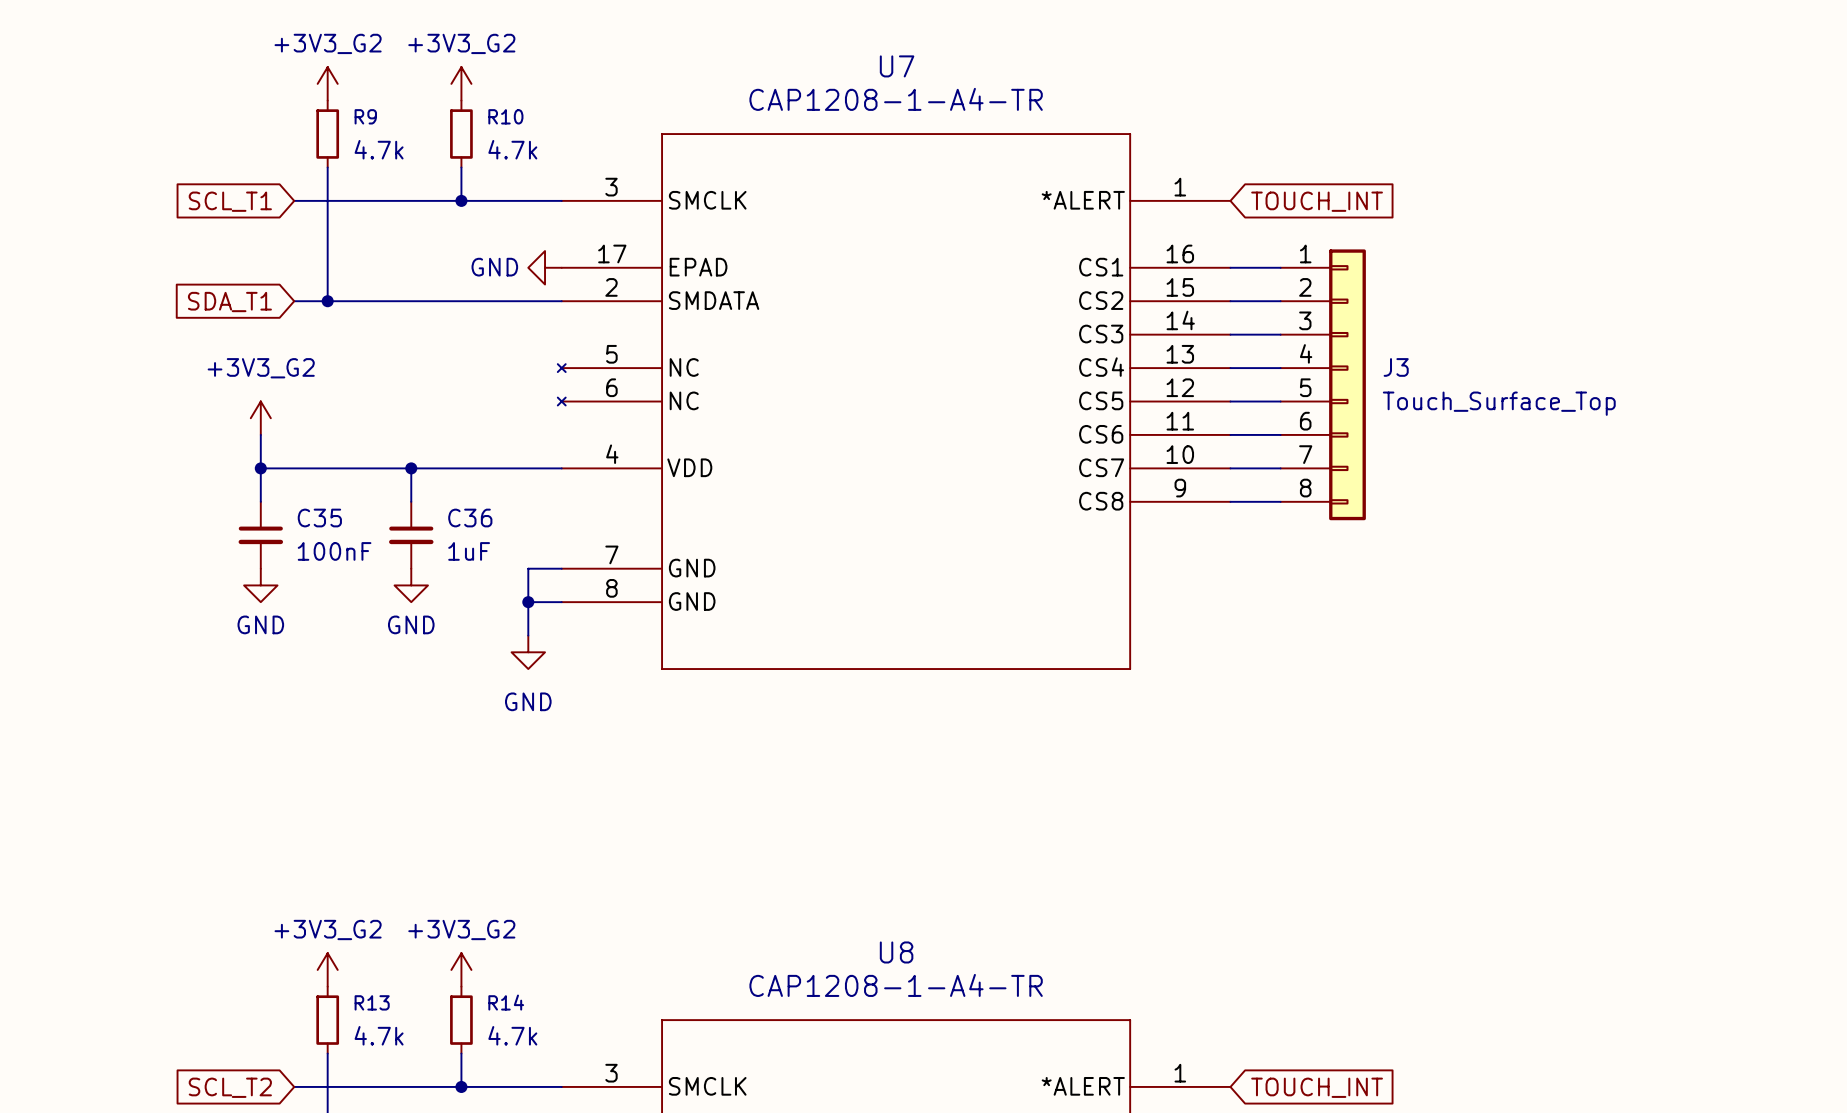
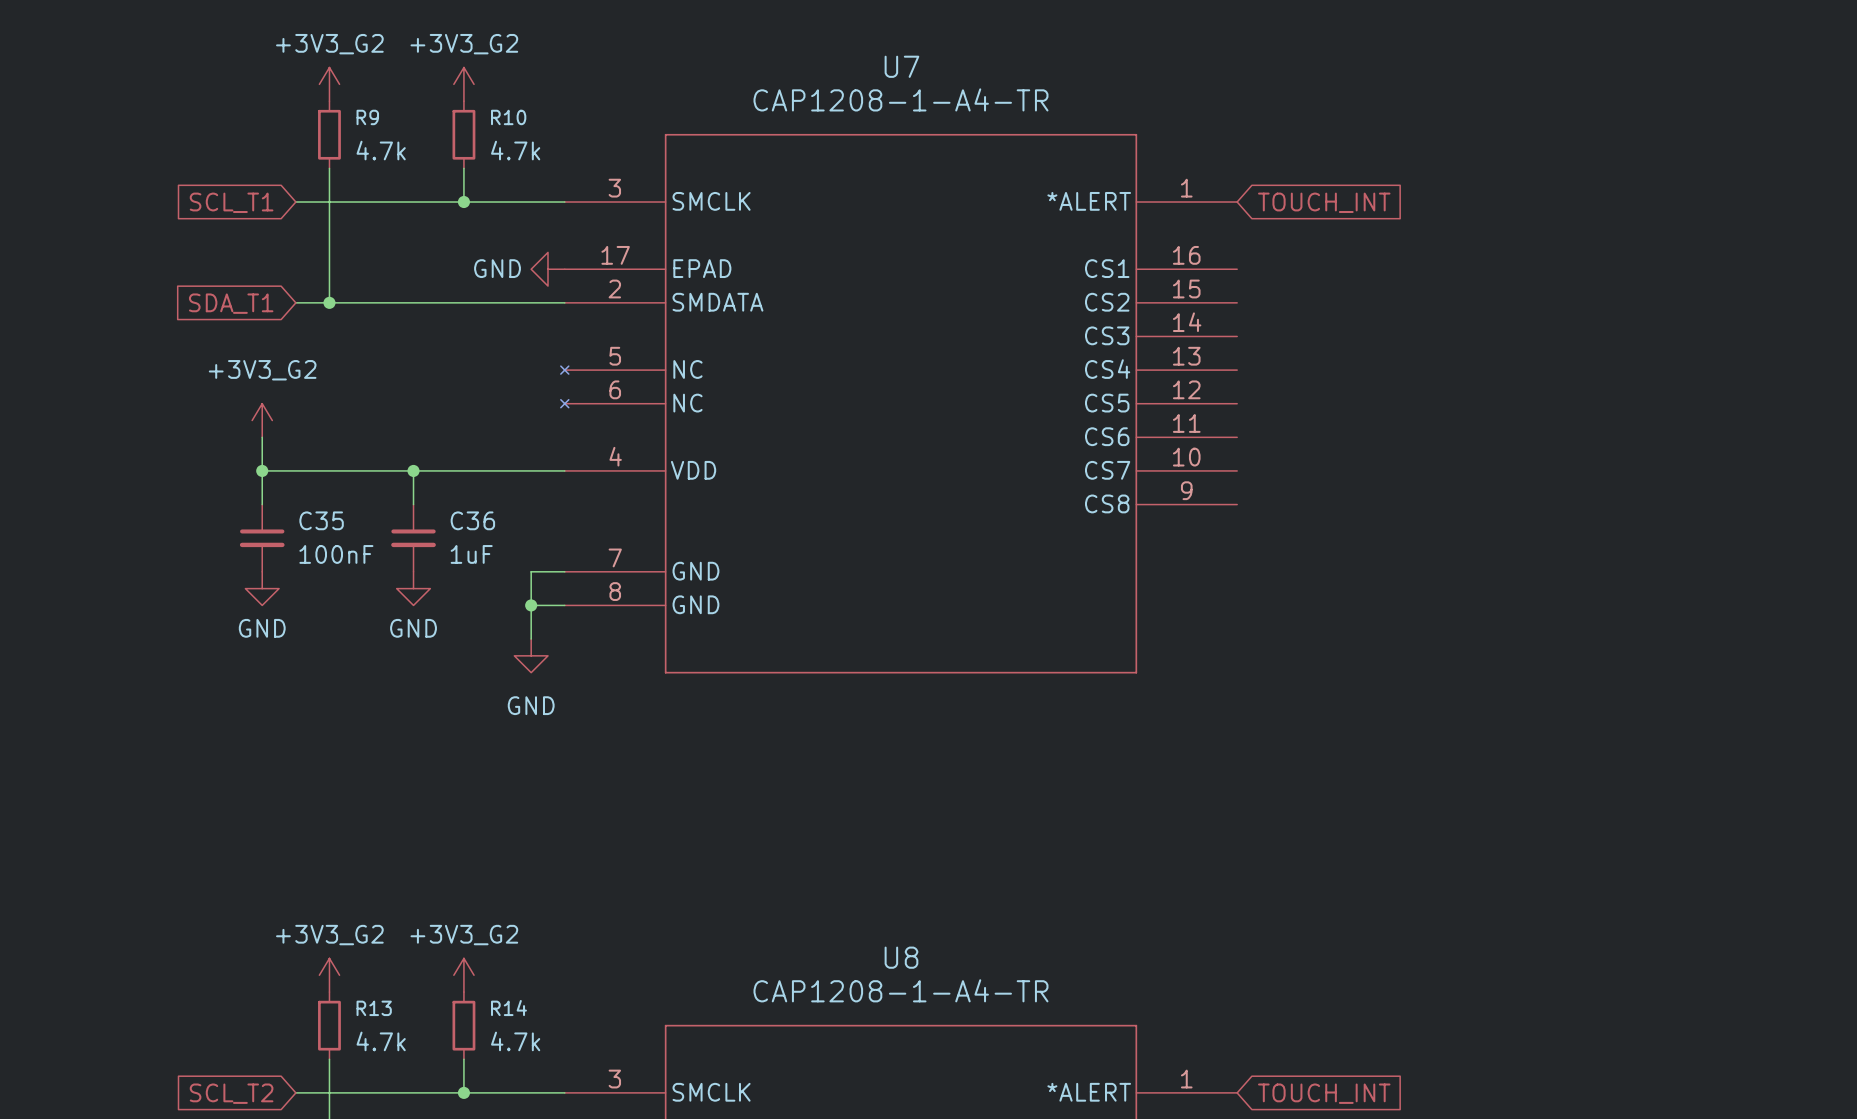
wire: (1230, 267) (1280, 267) -> none
wire: (1230, 301) (1280, 301) -> none
wire: (1230, 334) (1280, 334) -> none
wire: (1230, 368) (1280, 368) -> none
J3: Touch_Surface_Top (1323, 384) -> none
wire: (1230, 401) (1280, 401) -> none
wire: (1230, 434) (1280, 434) -> none
wire: (1230, 468) (1280, 468) -> none
wire: (1230, 501) (1280, 501) -> none

